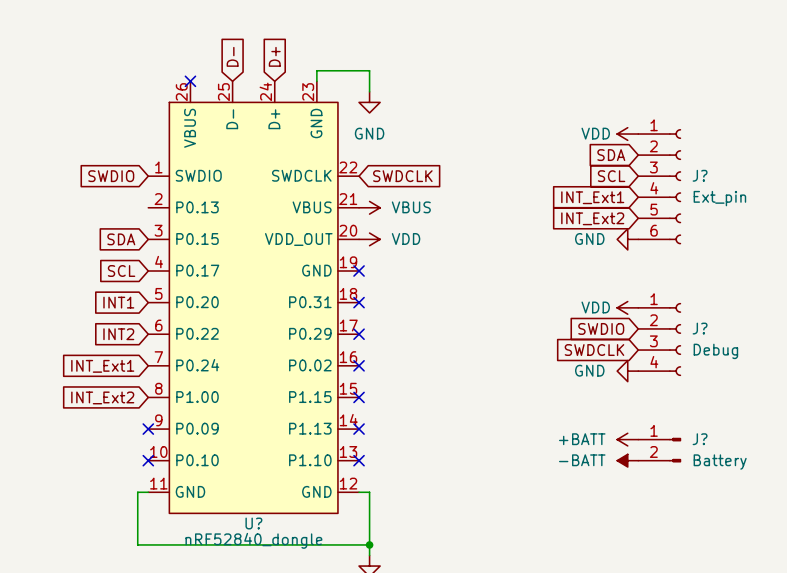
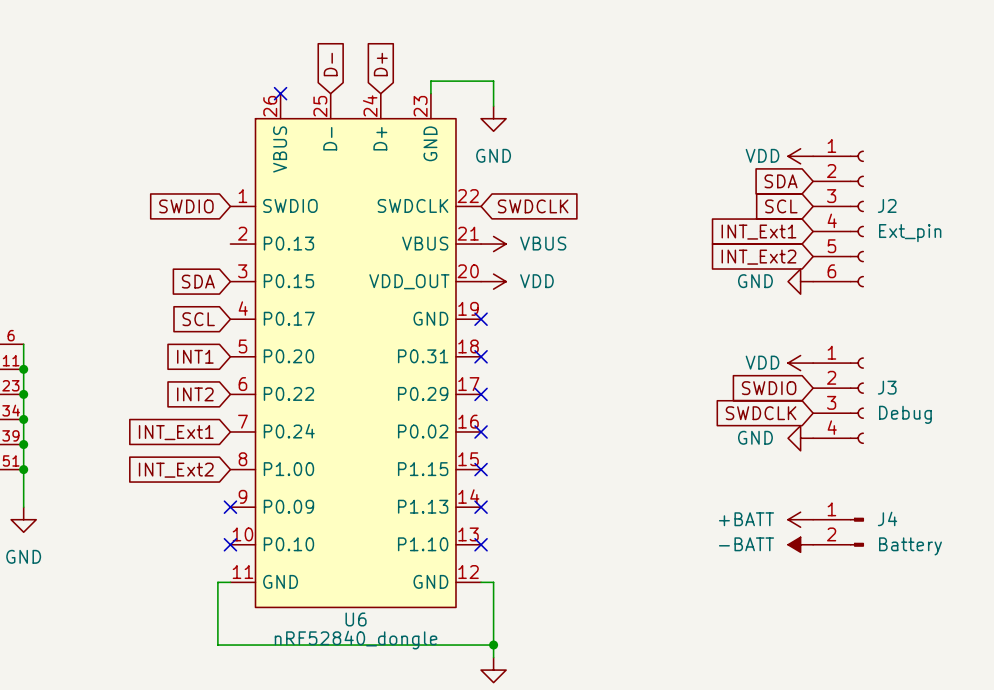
J? name: J? (700, 175) -> J2 (887, 205)
J? name: J? (700, 328) -> J3 (887, 387)
J? name: J? (700, 439) -> J4 (887, 518)
U? name: U? (253, 523) -> U6 (356, 619)

